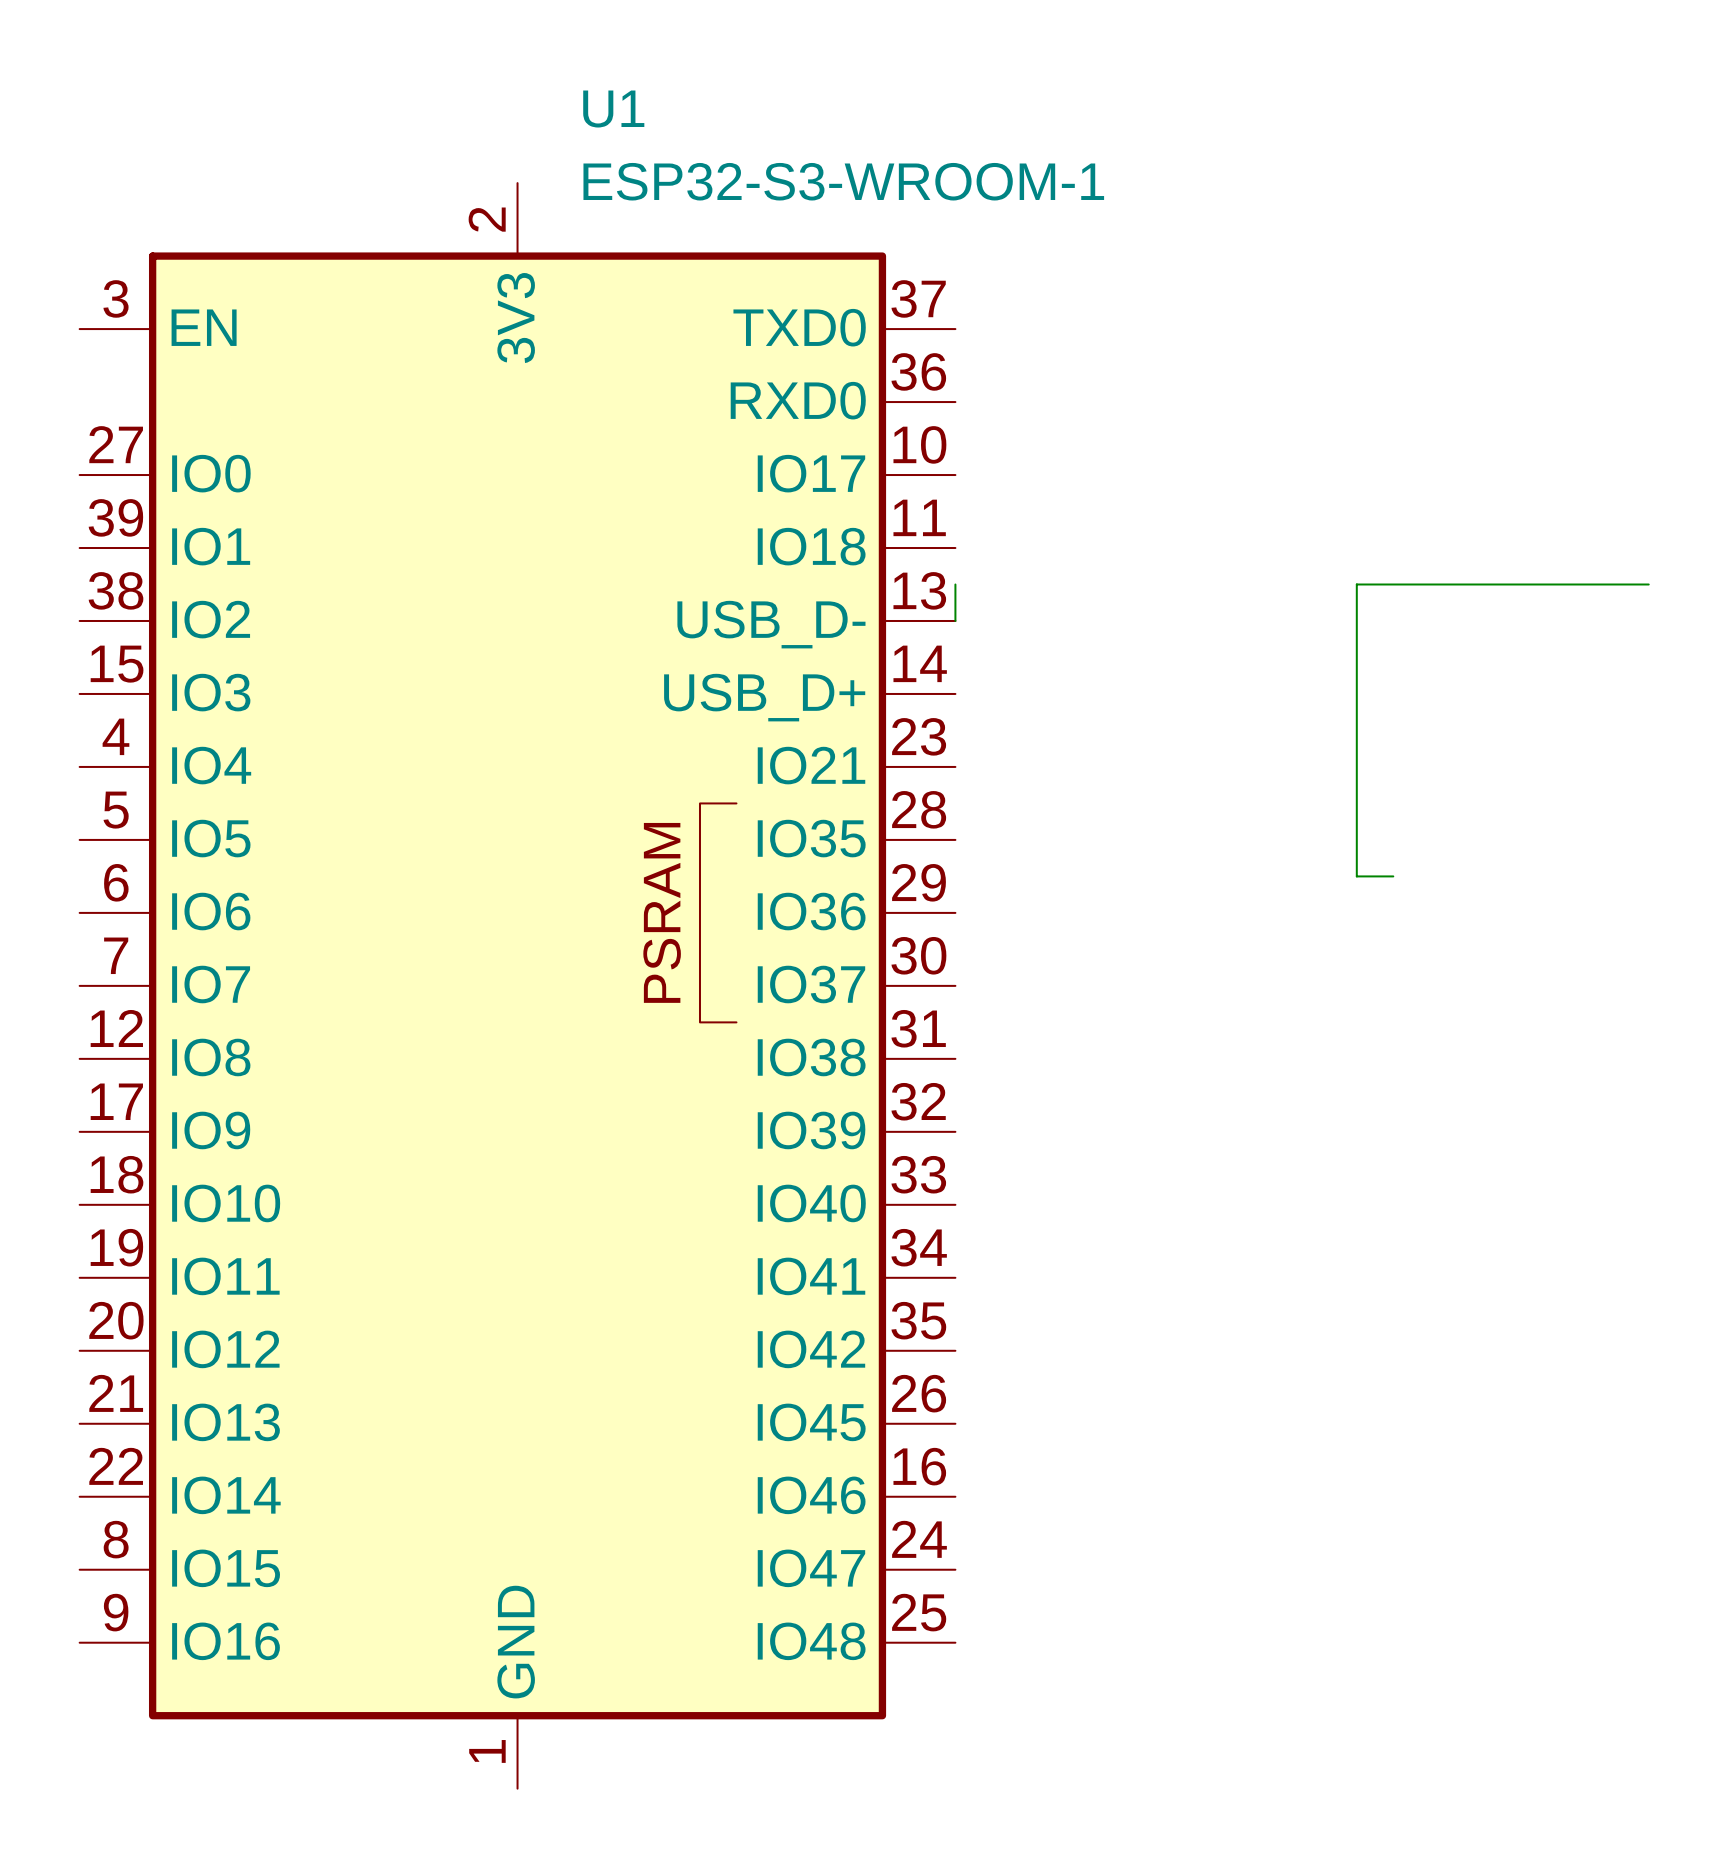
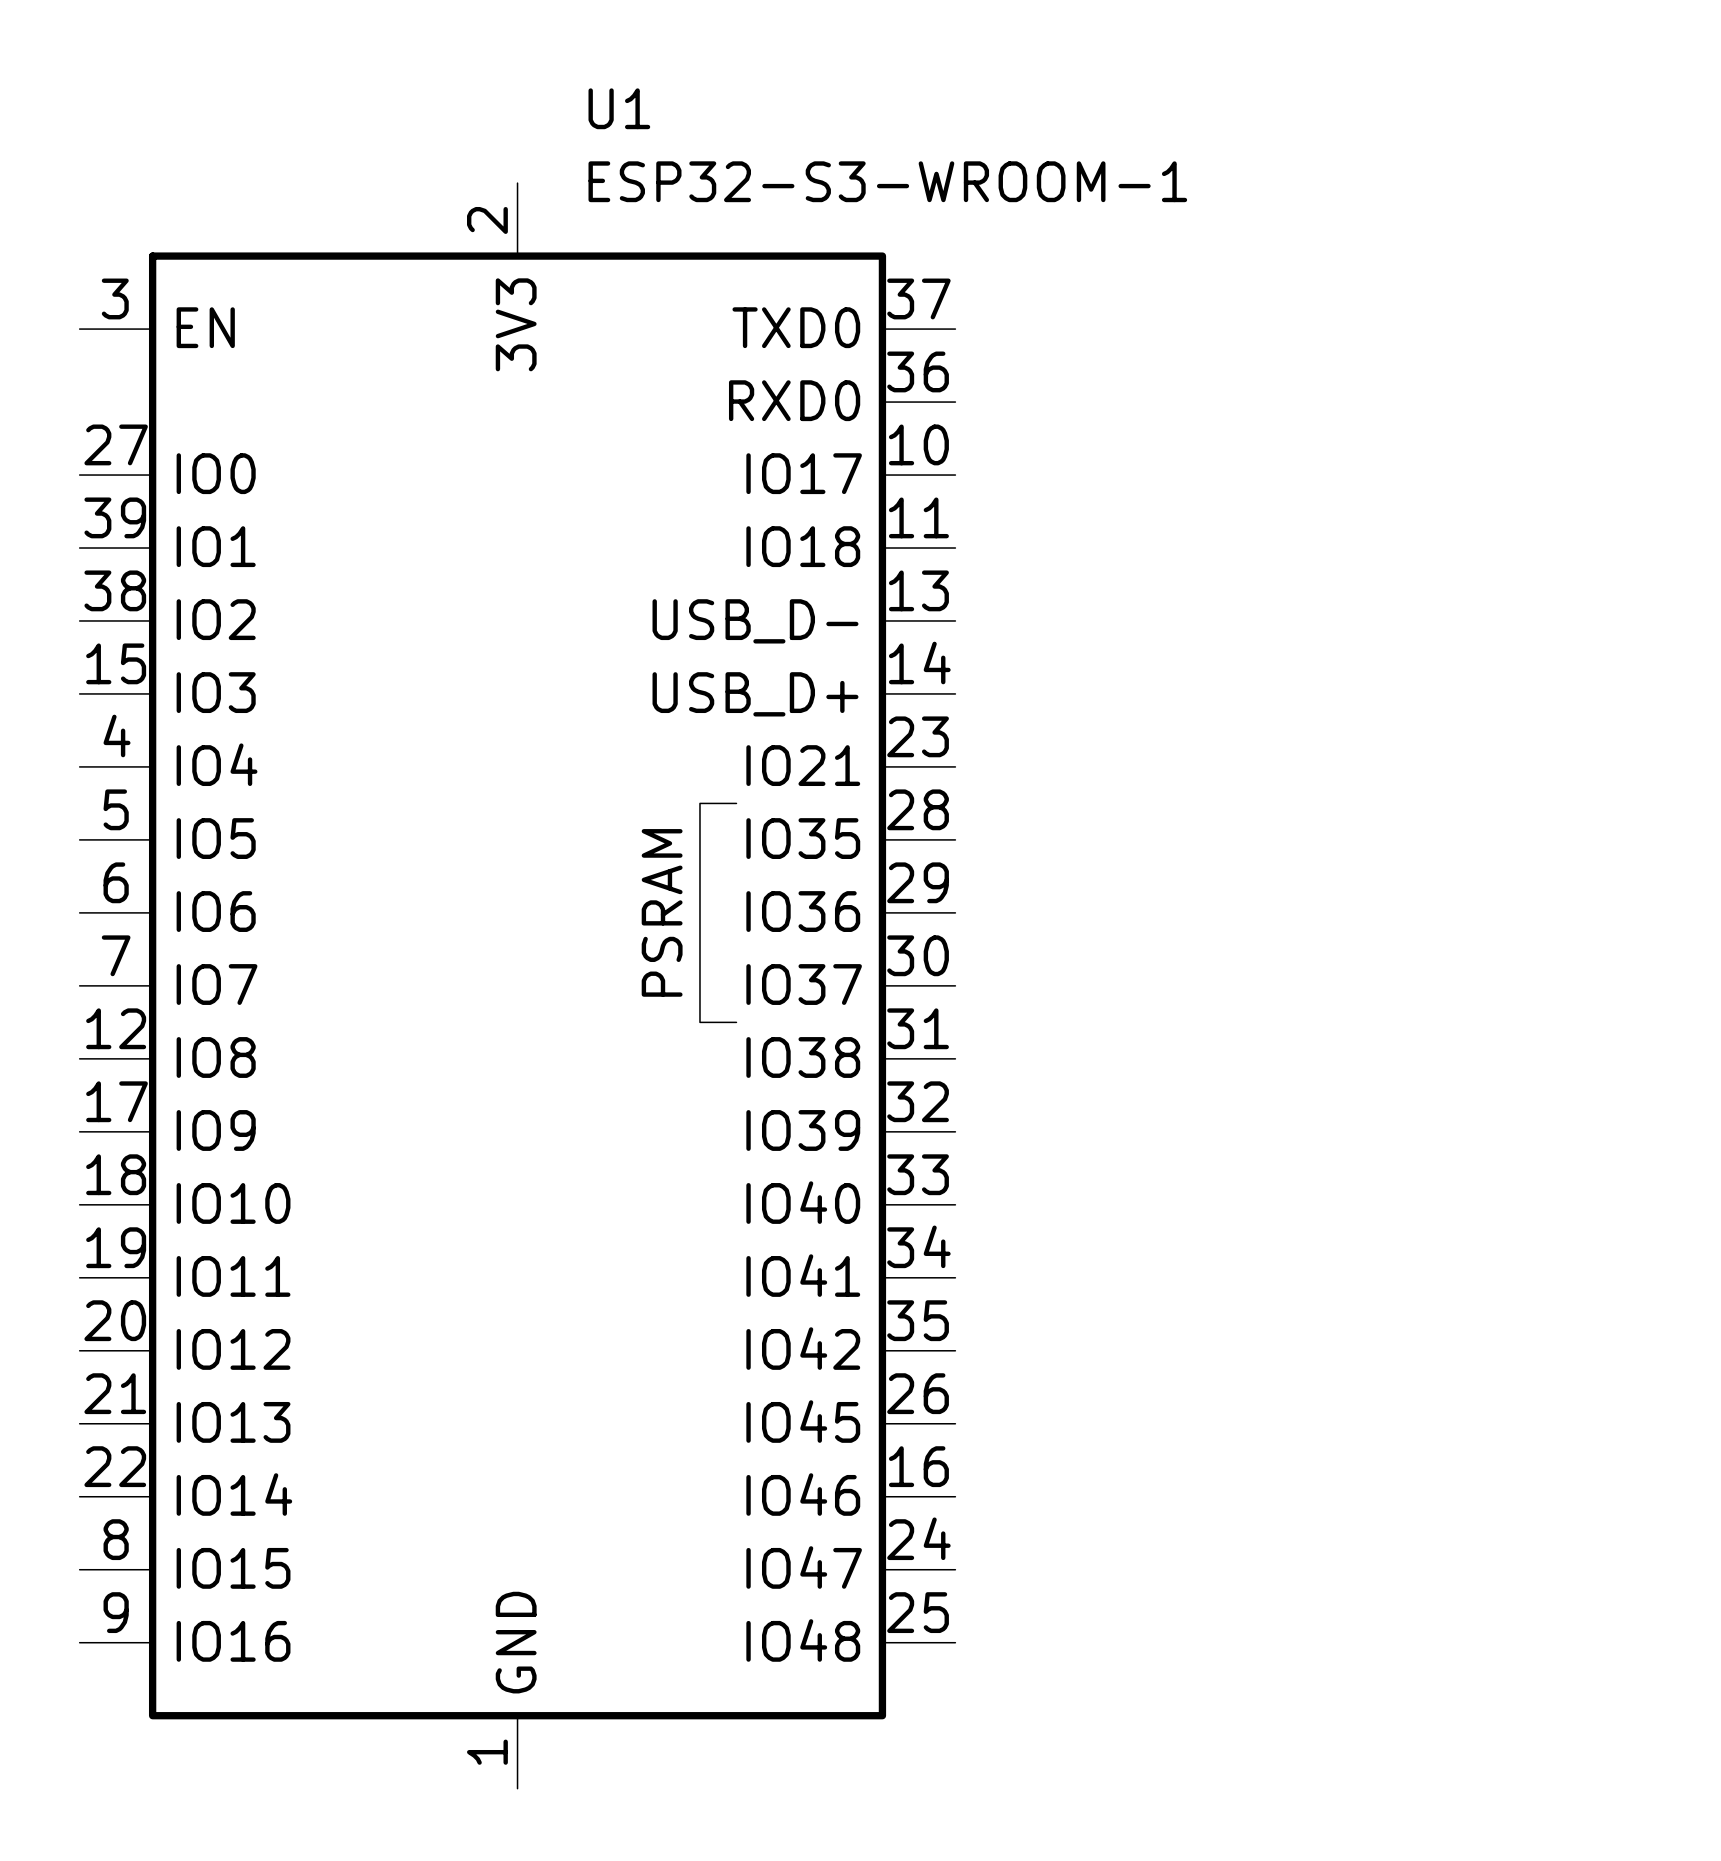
wire: (955, 584) (955, 620) -> none
wire: (1648, 584) (1356, 584) (1356, 876) (1393, 876) -> none

